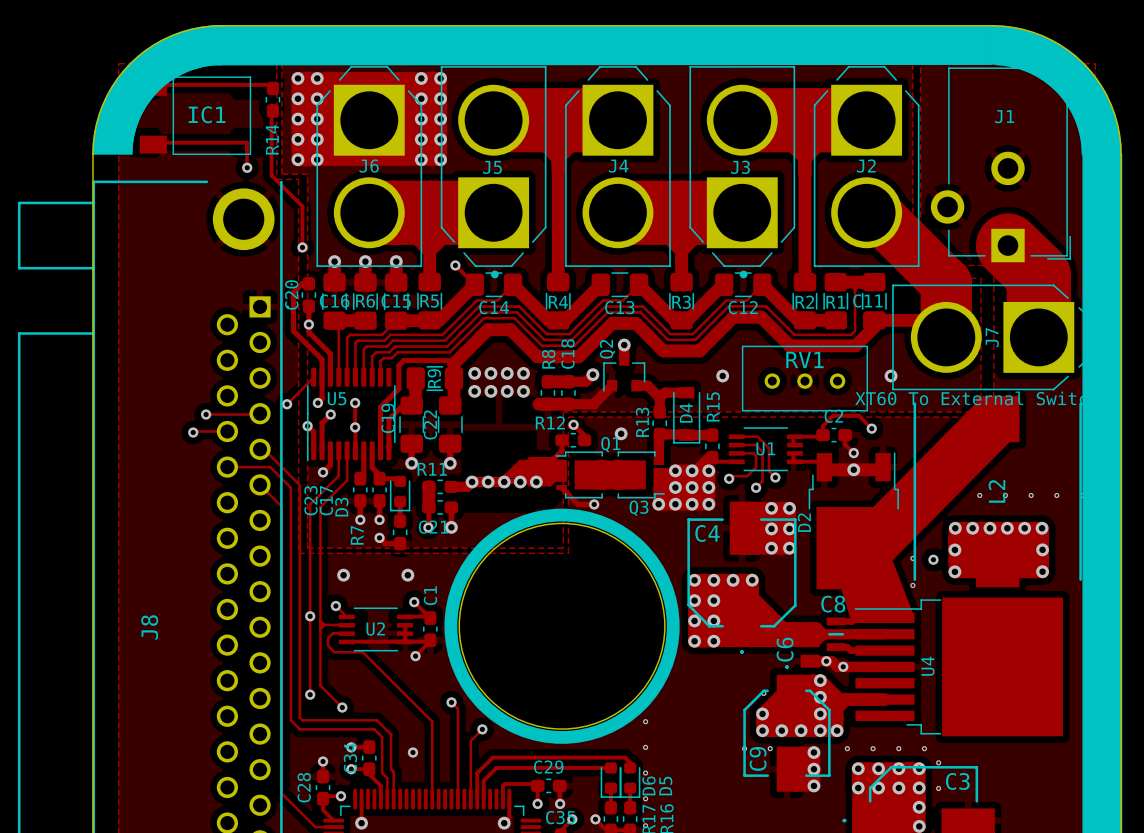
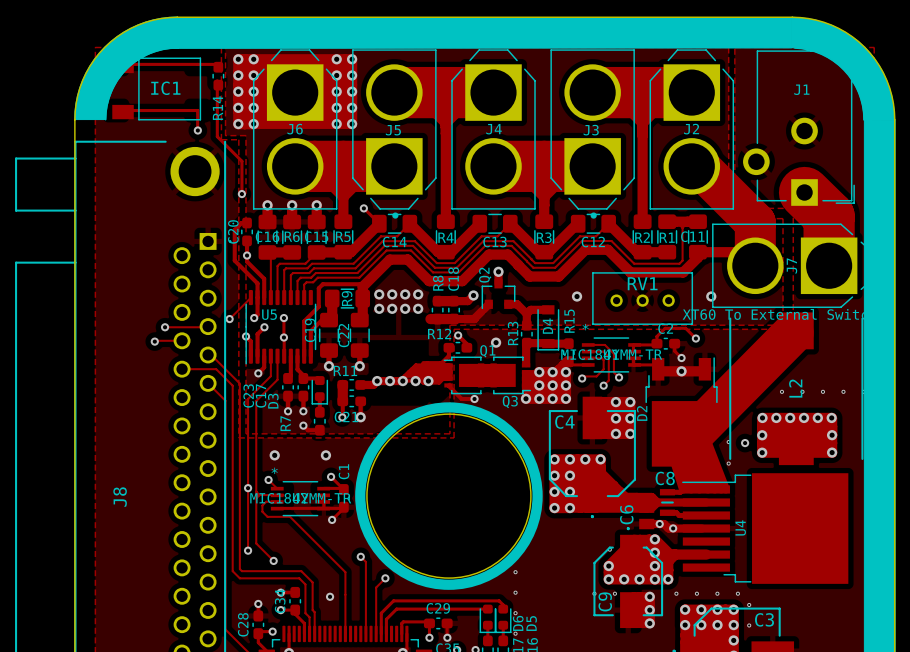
U1 text: none -> * (585, 327)
U1 value: none -> MIC184YMM-TR (611, 354)
U2 text: none -> * (274, 470)
U2 value: none -> MIC184YMM-TR (300, 498)

